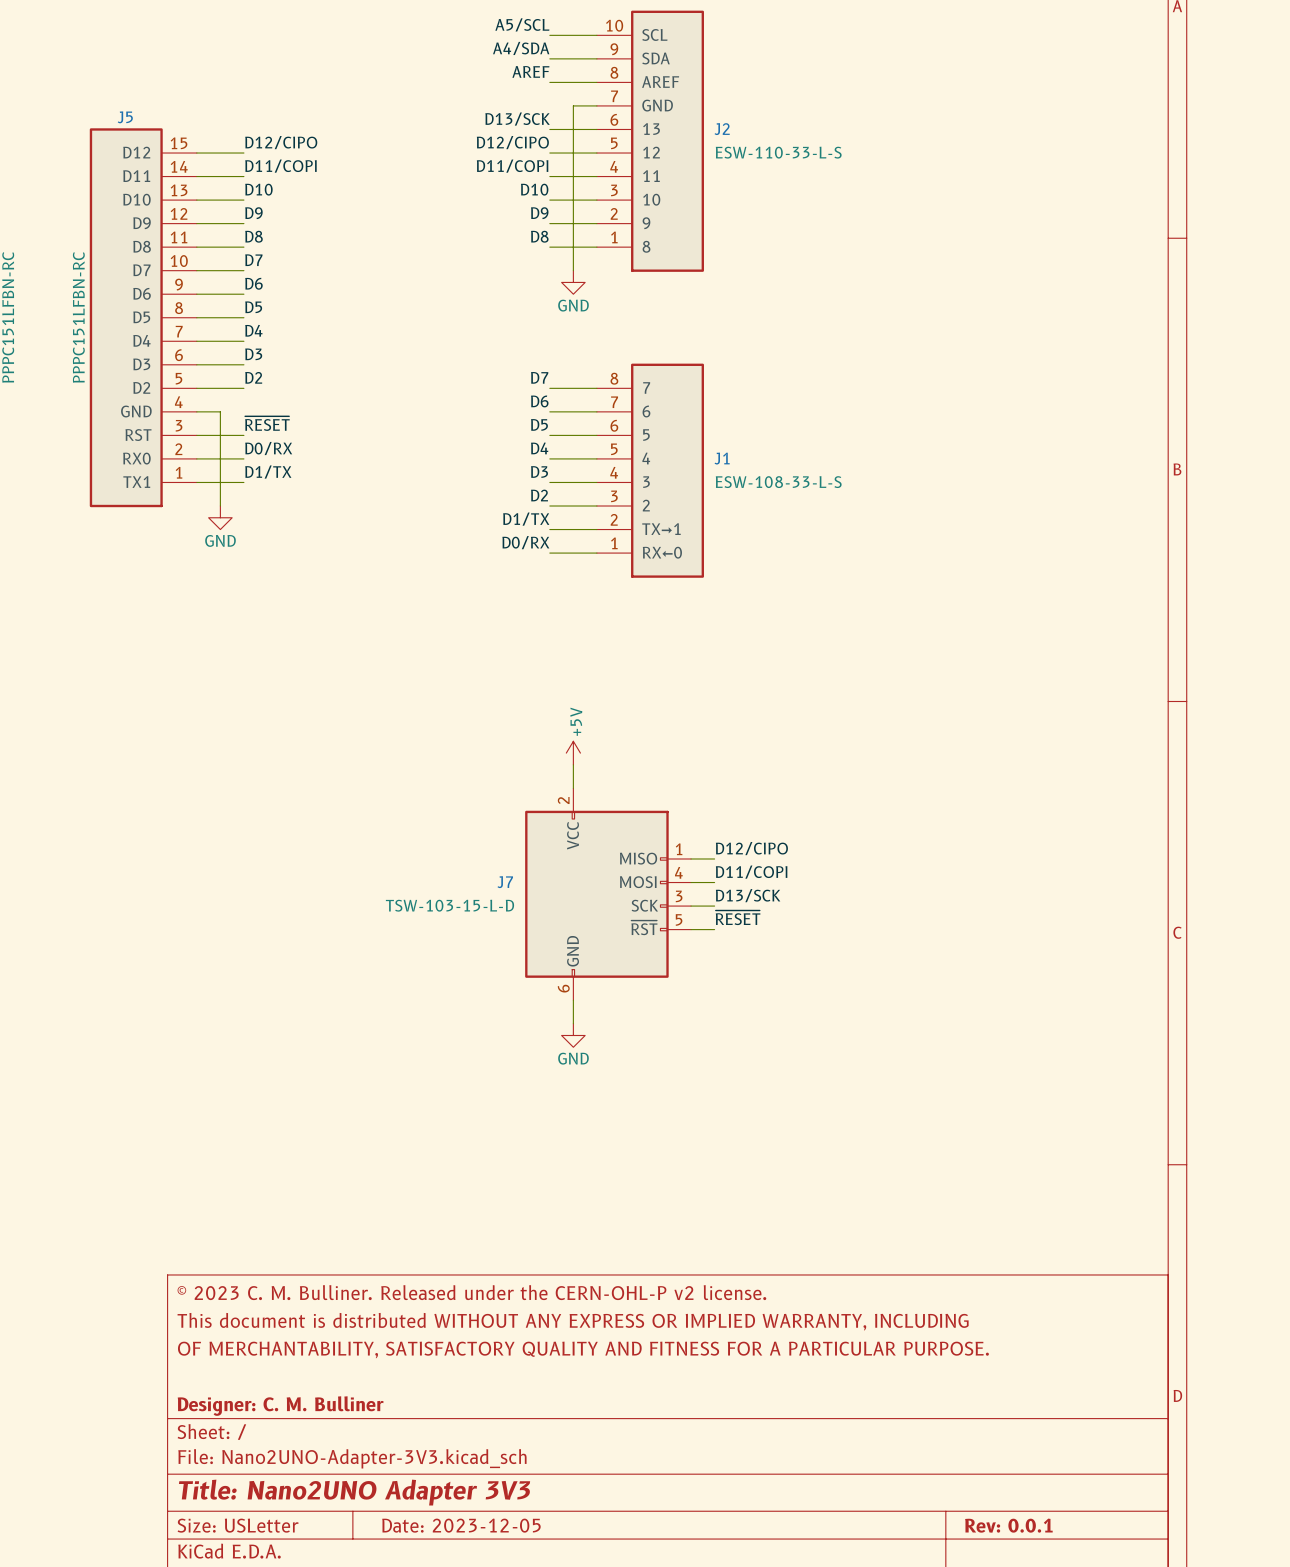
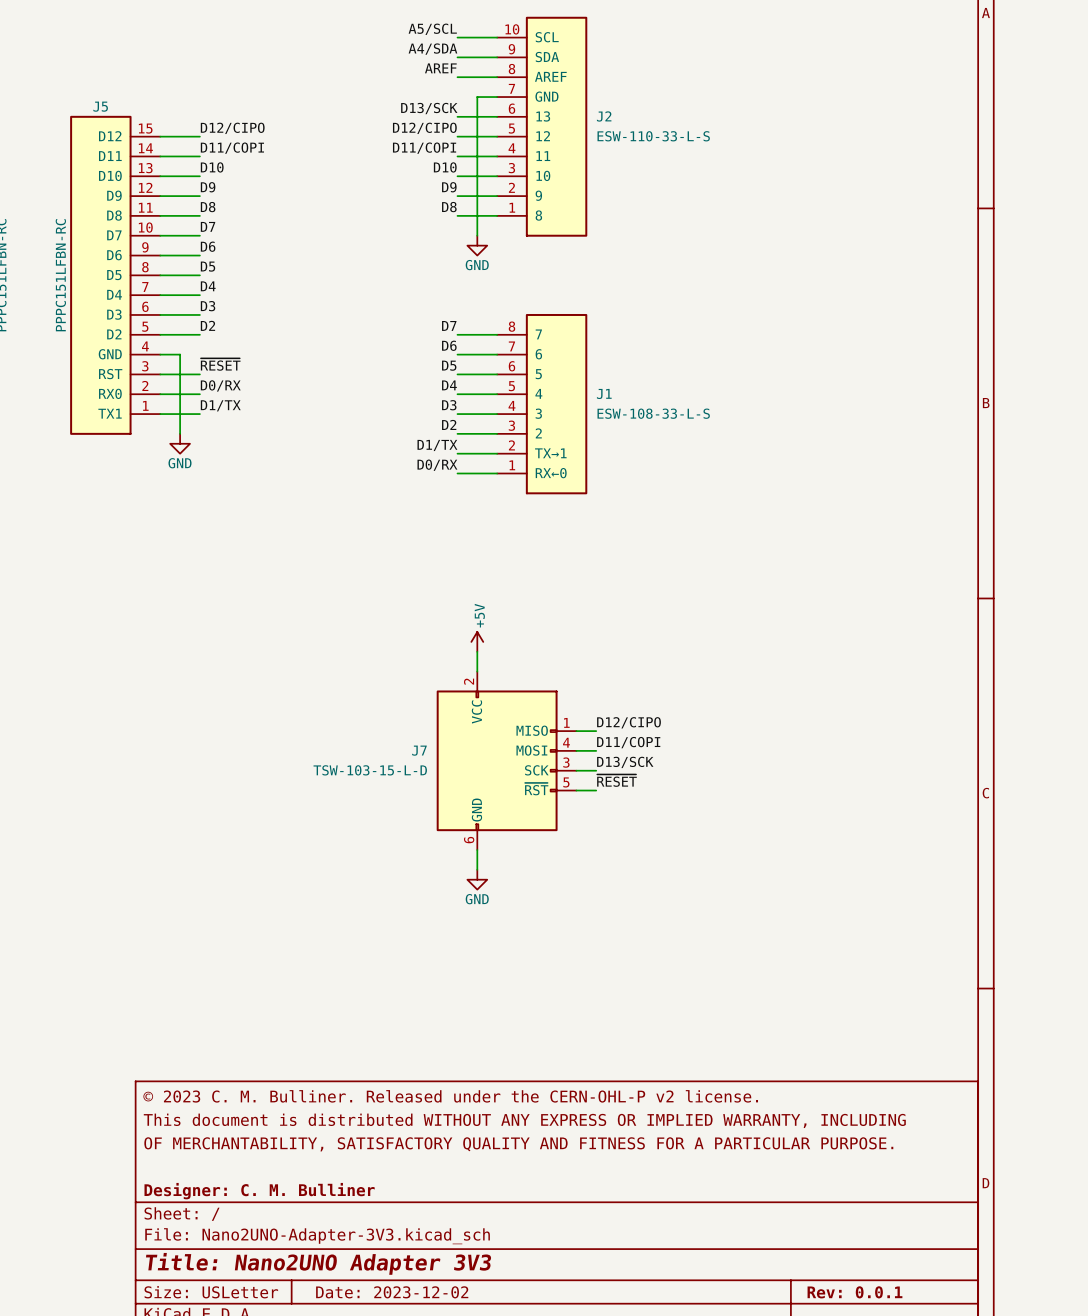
title block: Date: 2023-12-05 (461, 1525) -> Date: 2023-12-02 (392, 1292)

